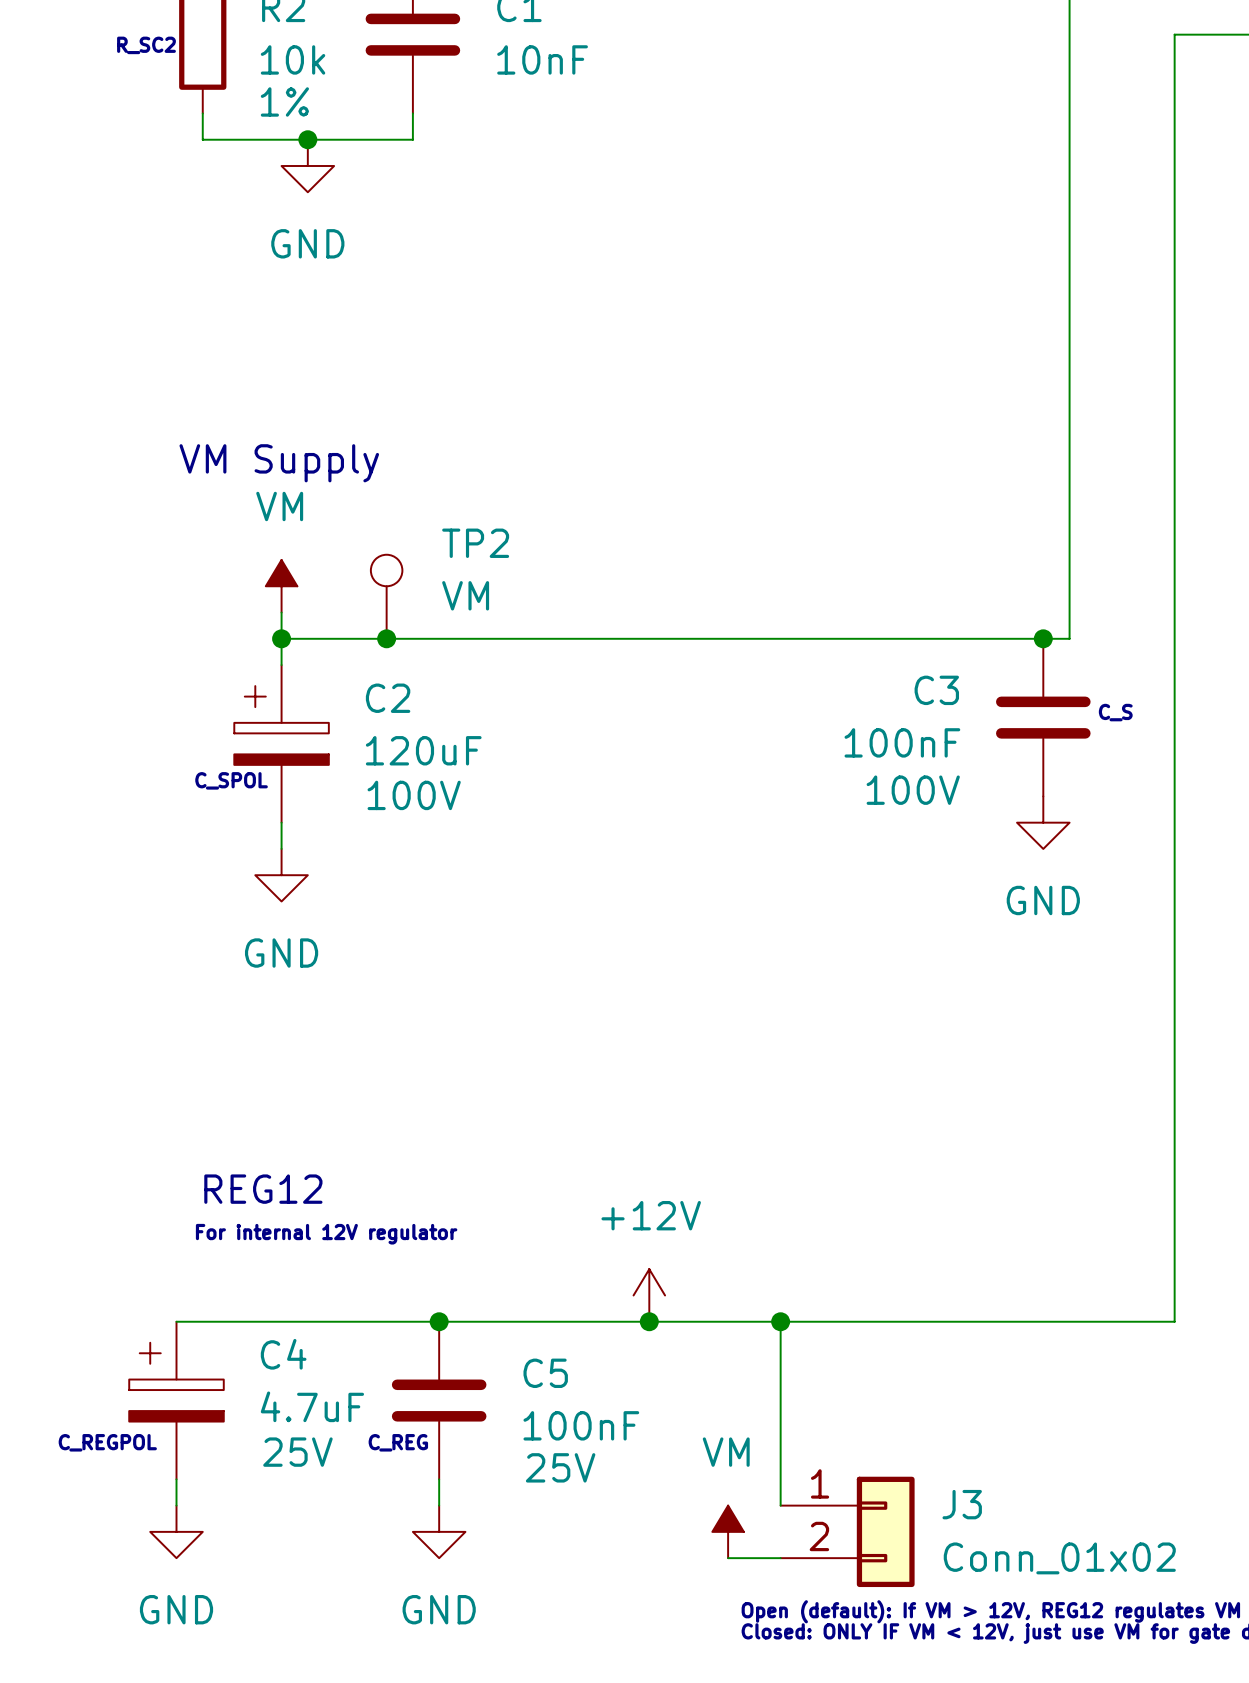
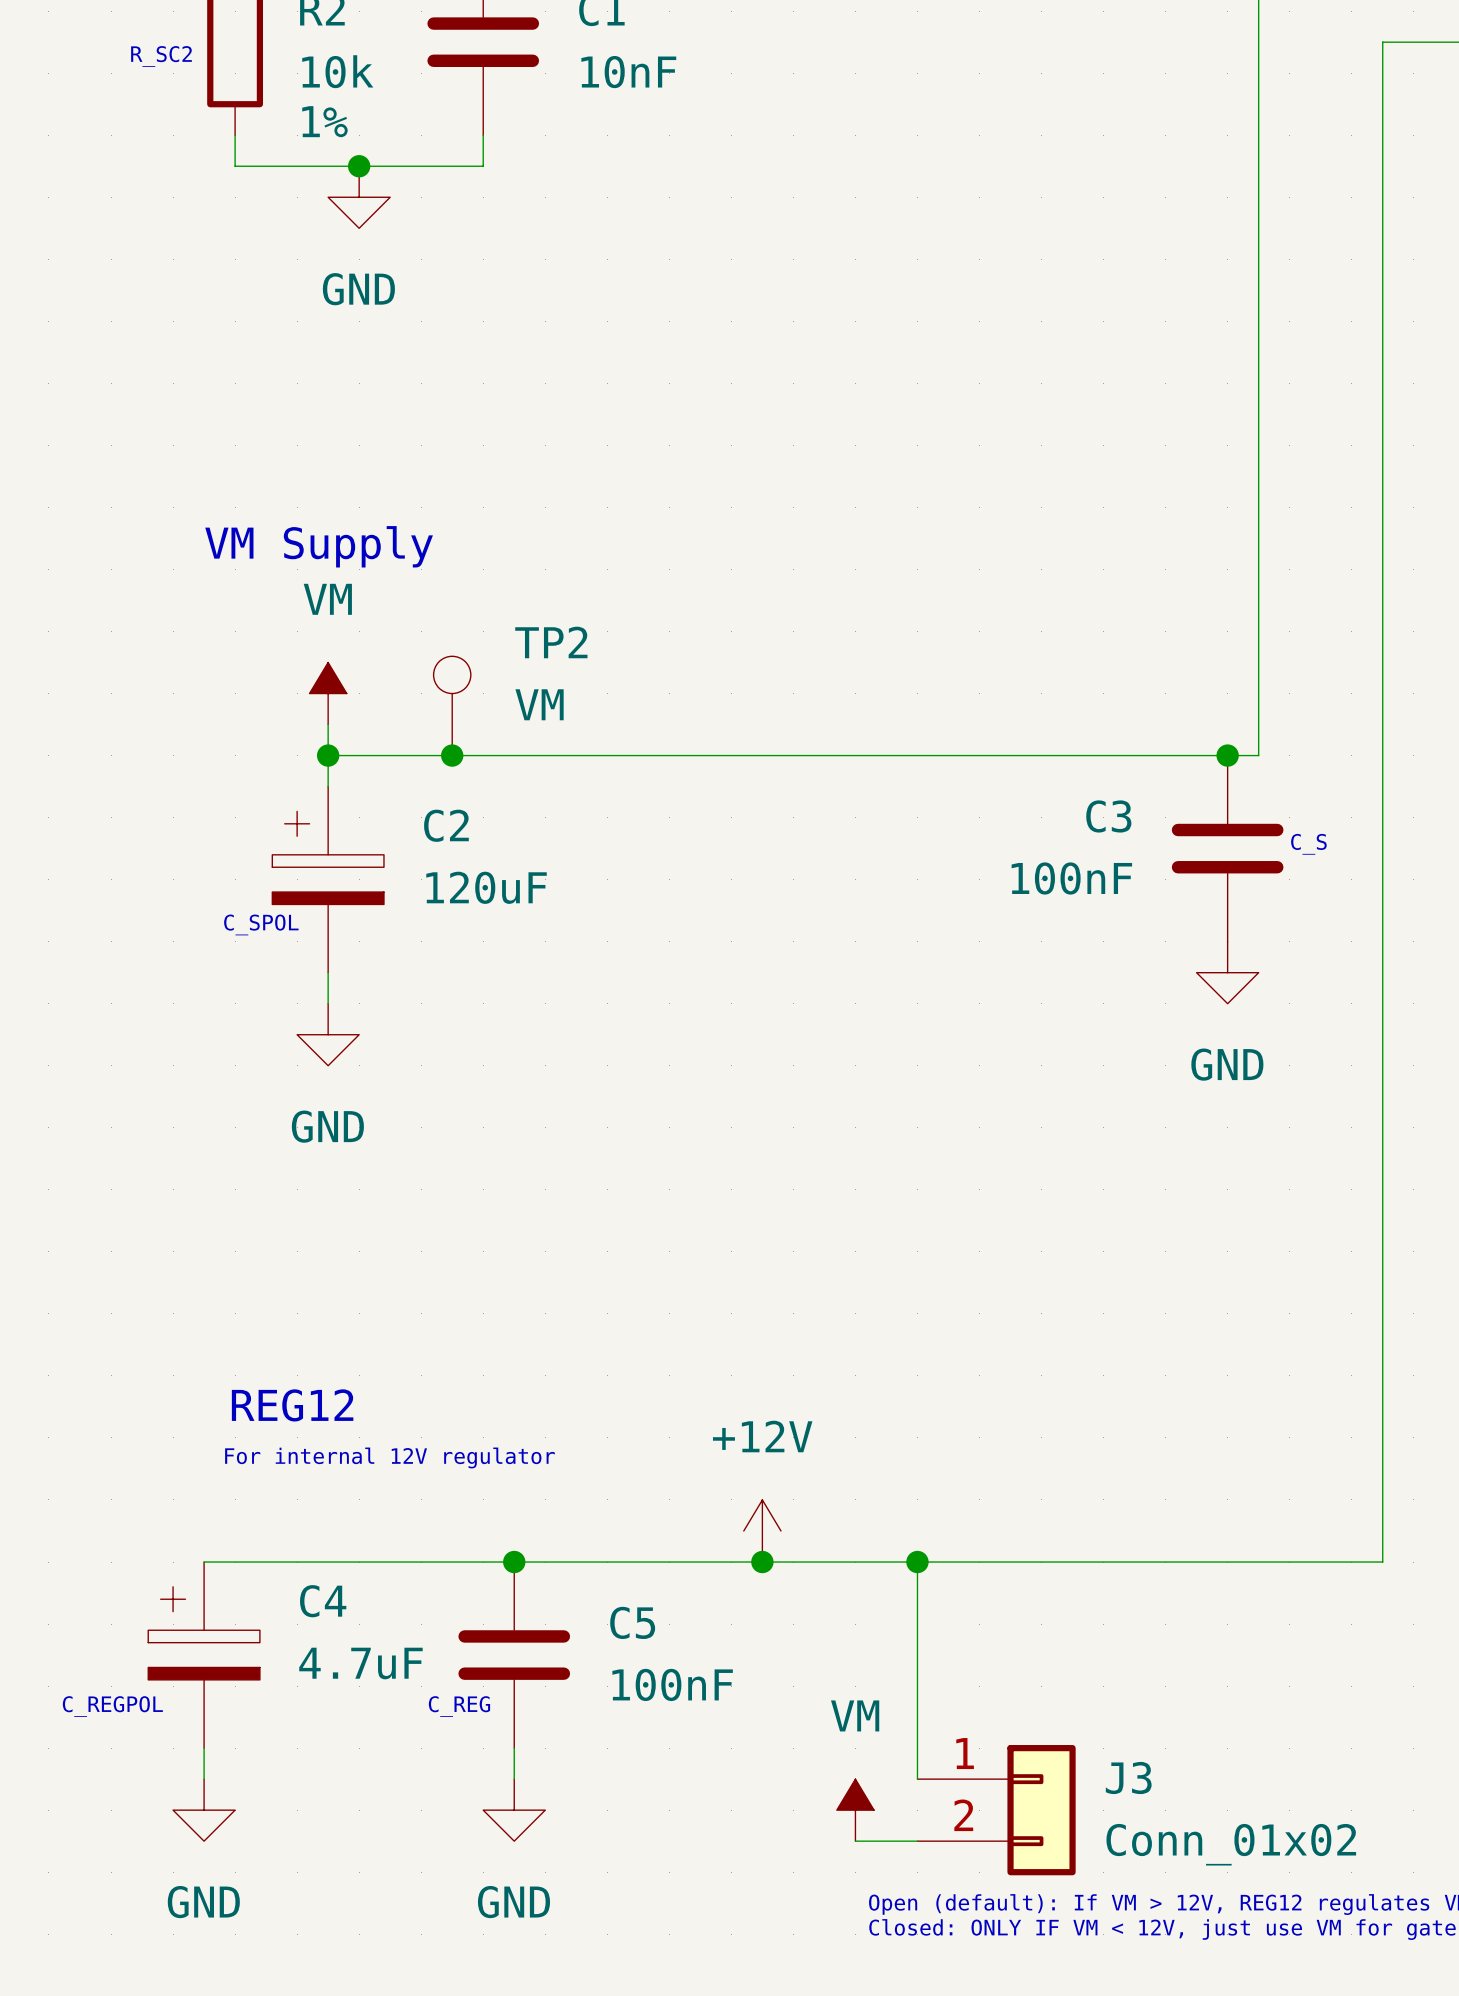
C3 text: 100V (913, 790) -> none
C2 text: 100V (414, 795) -> none
C4 text: 25V (297, 1452) -> none
C5 text: 25V (560, 1467) -> none

